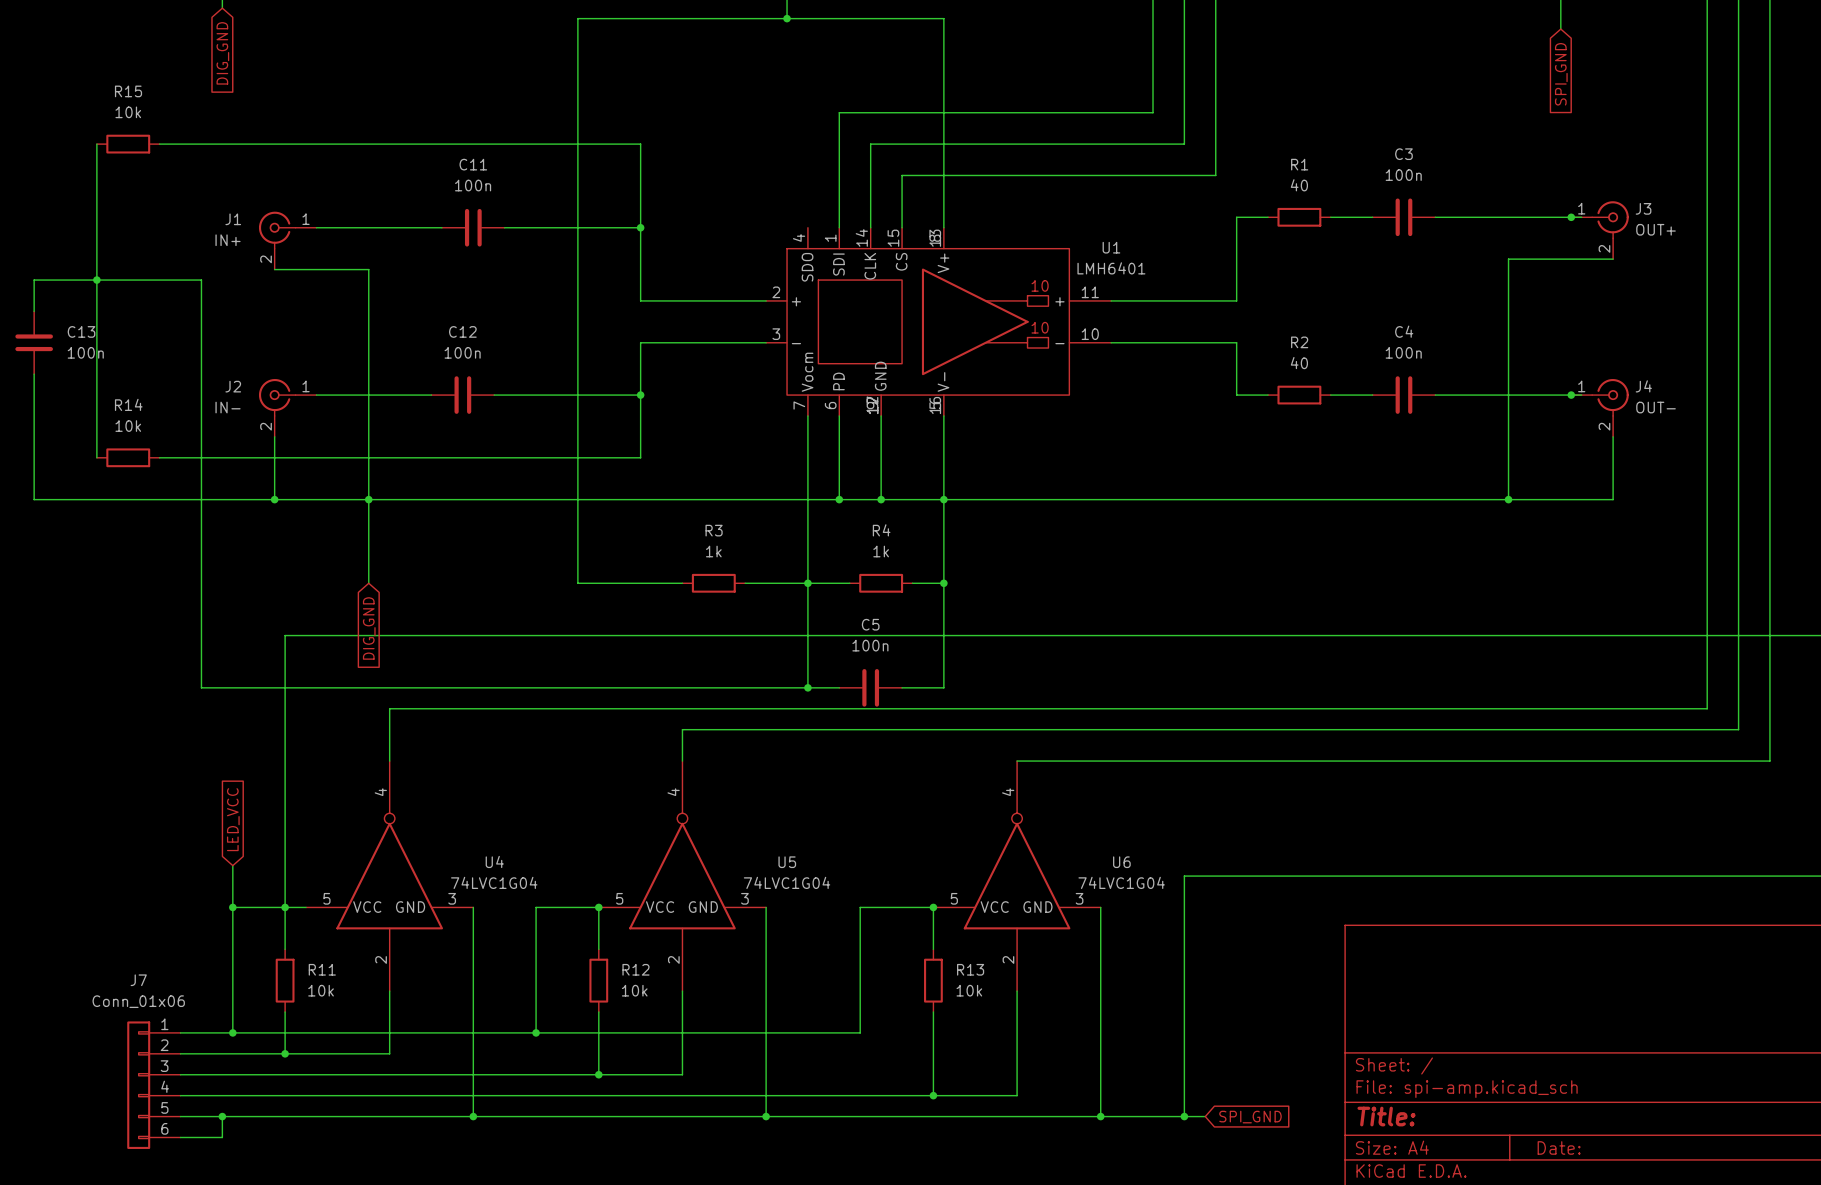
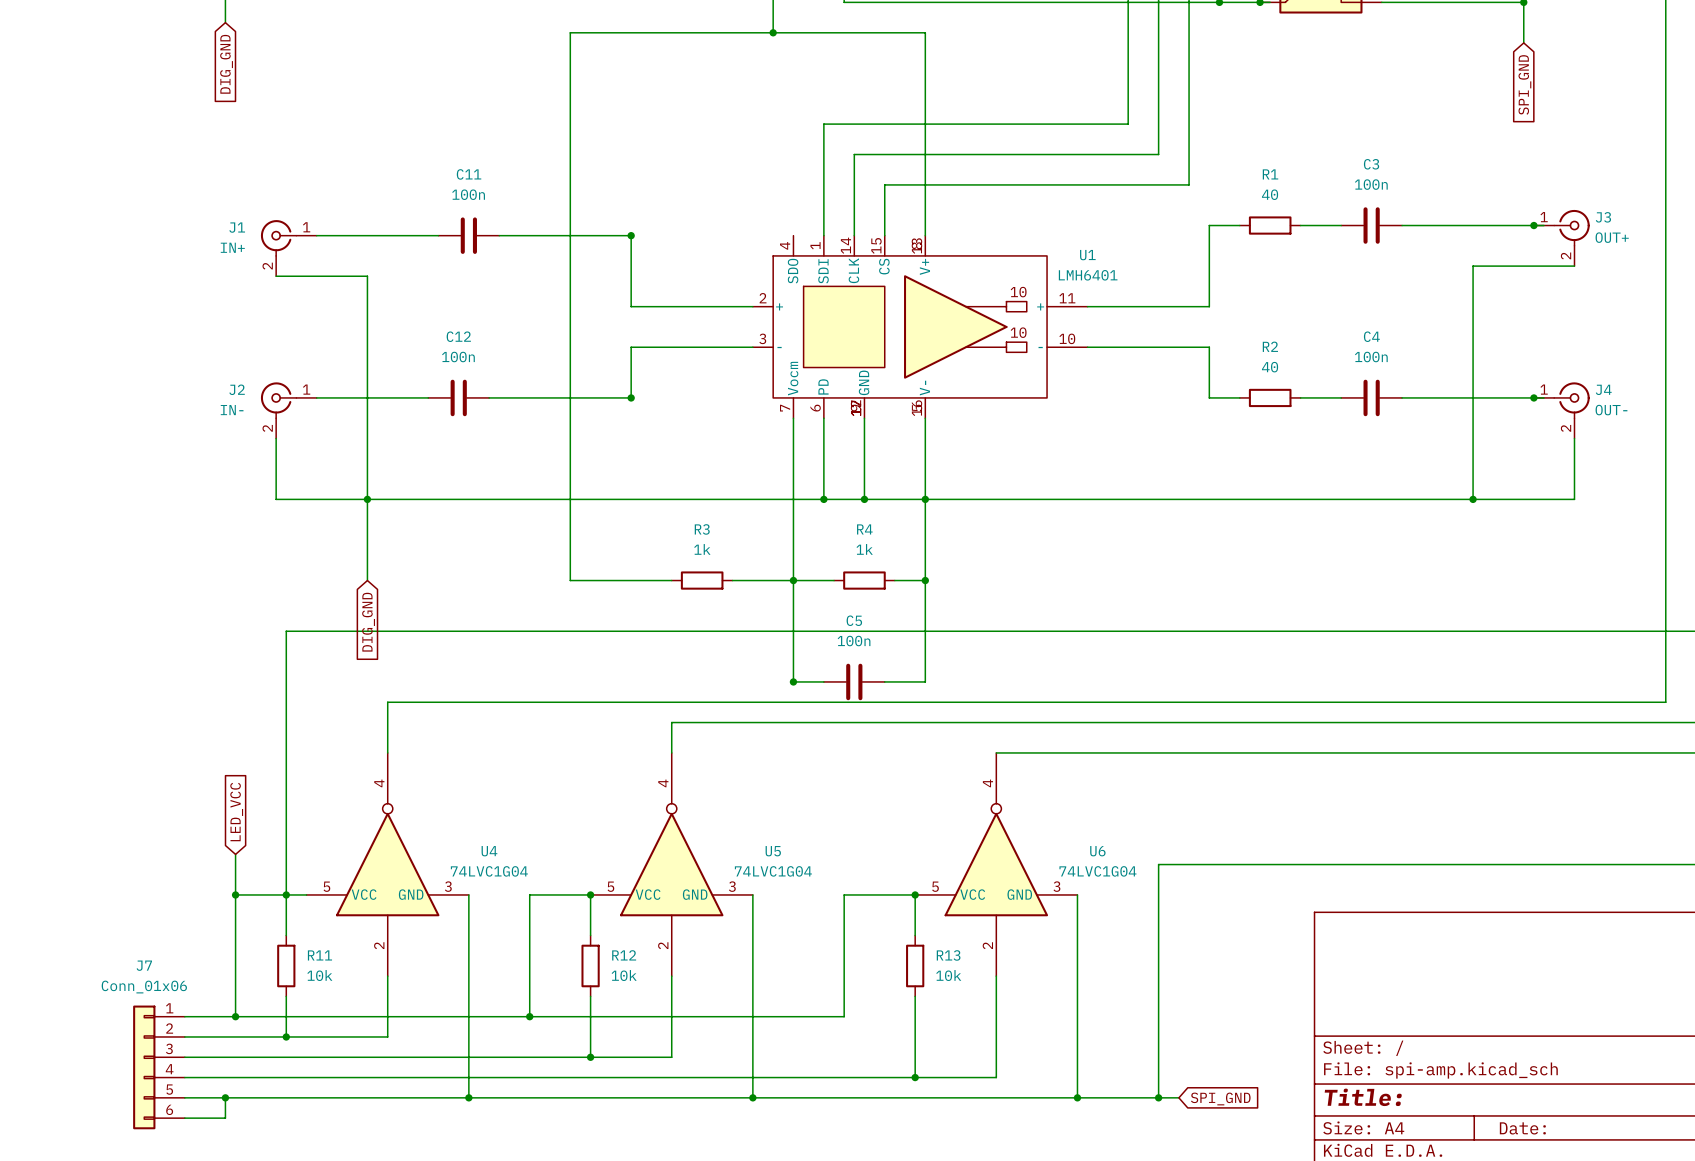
wire: (96, 144) (96, 457) -> none
R15: 10k (128, 144) -> none
wire: (159, 144) (640, 144) (640, 227) -> none
junction: (96, 280) -> none
wire: (34, 311) (34, 280) (201, 280) (201, 687) (807, 687) -> none
C13: 100n (34, 342) -> none
wire: (34, 374) (34, 499) (274, 499) -> none
wire: (640, 395) (640, 457) (159, 457) -> none
R14: 10k (128, 457) -> none
junction: (274, 499) -> none

